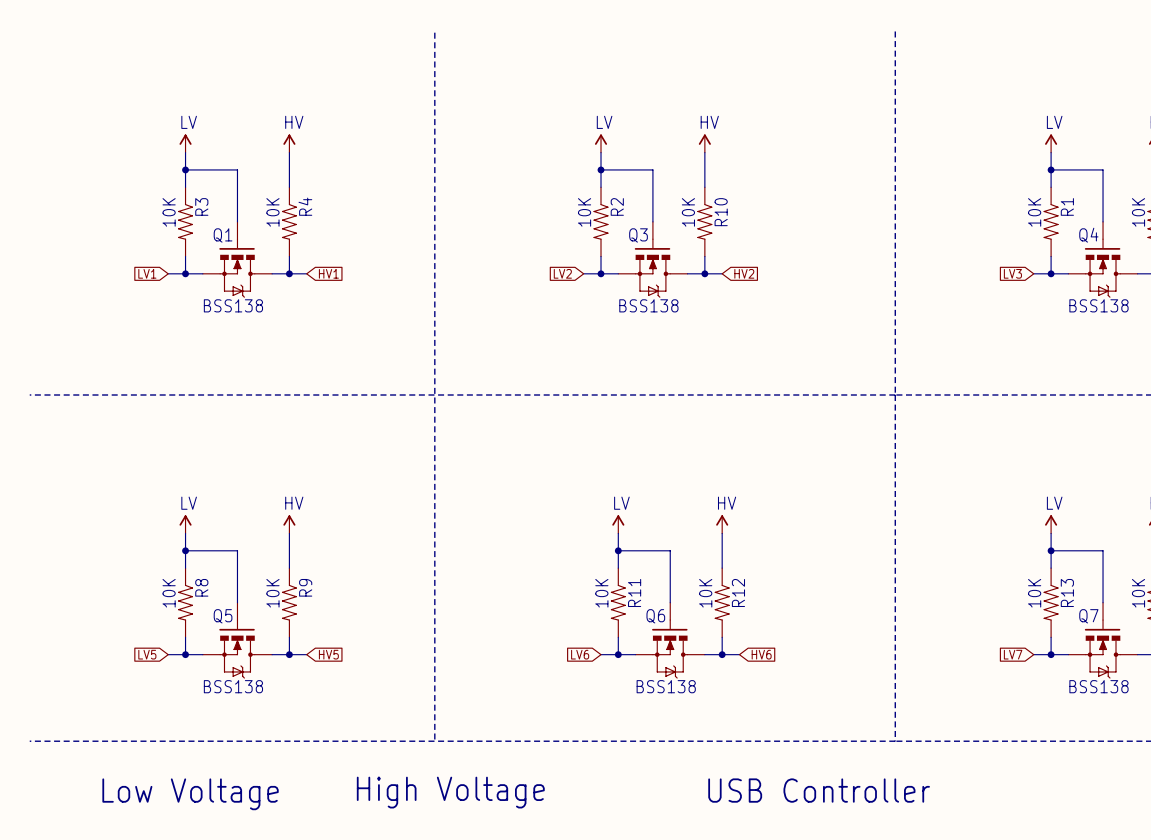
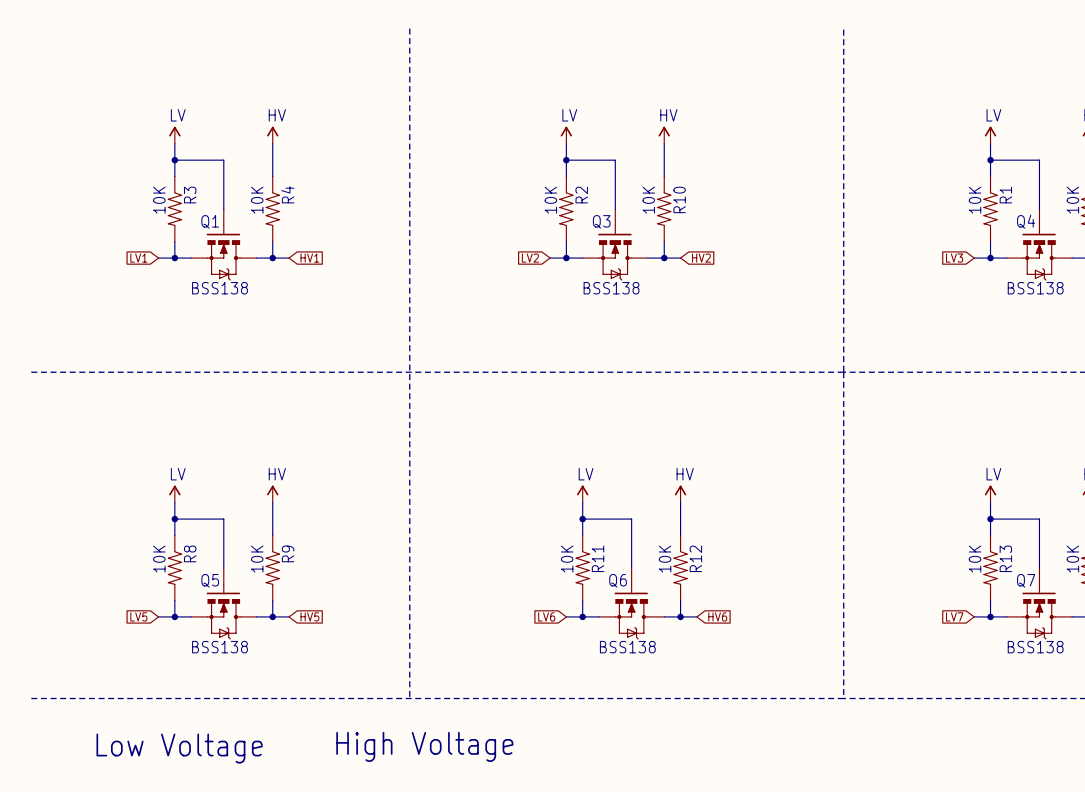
text: USB Controller (819, 790) -> none

